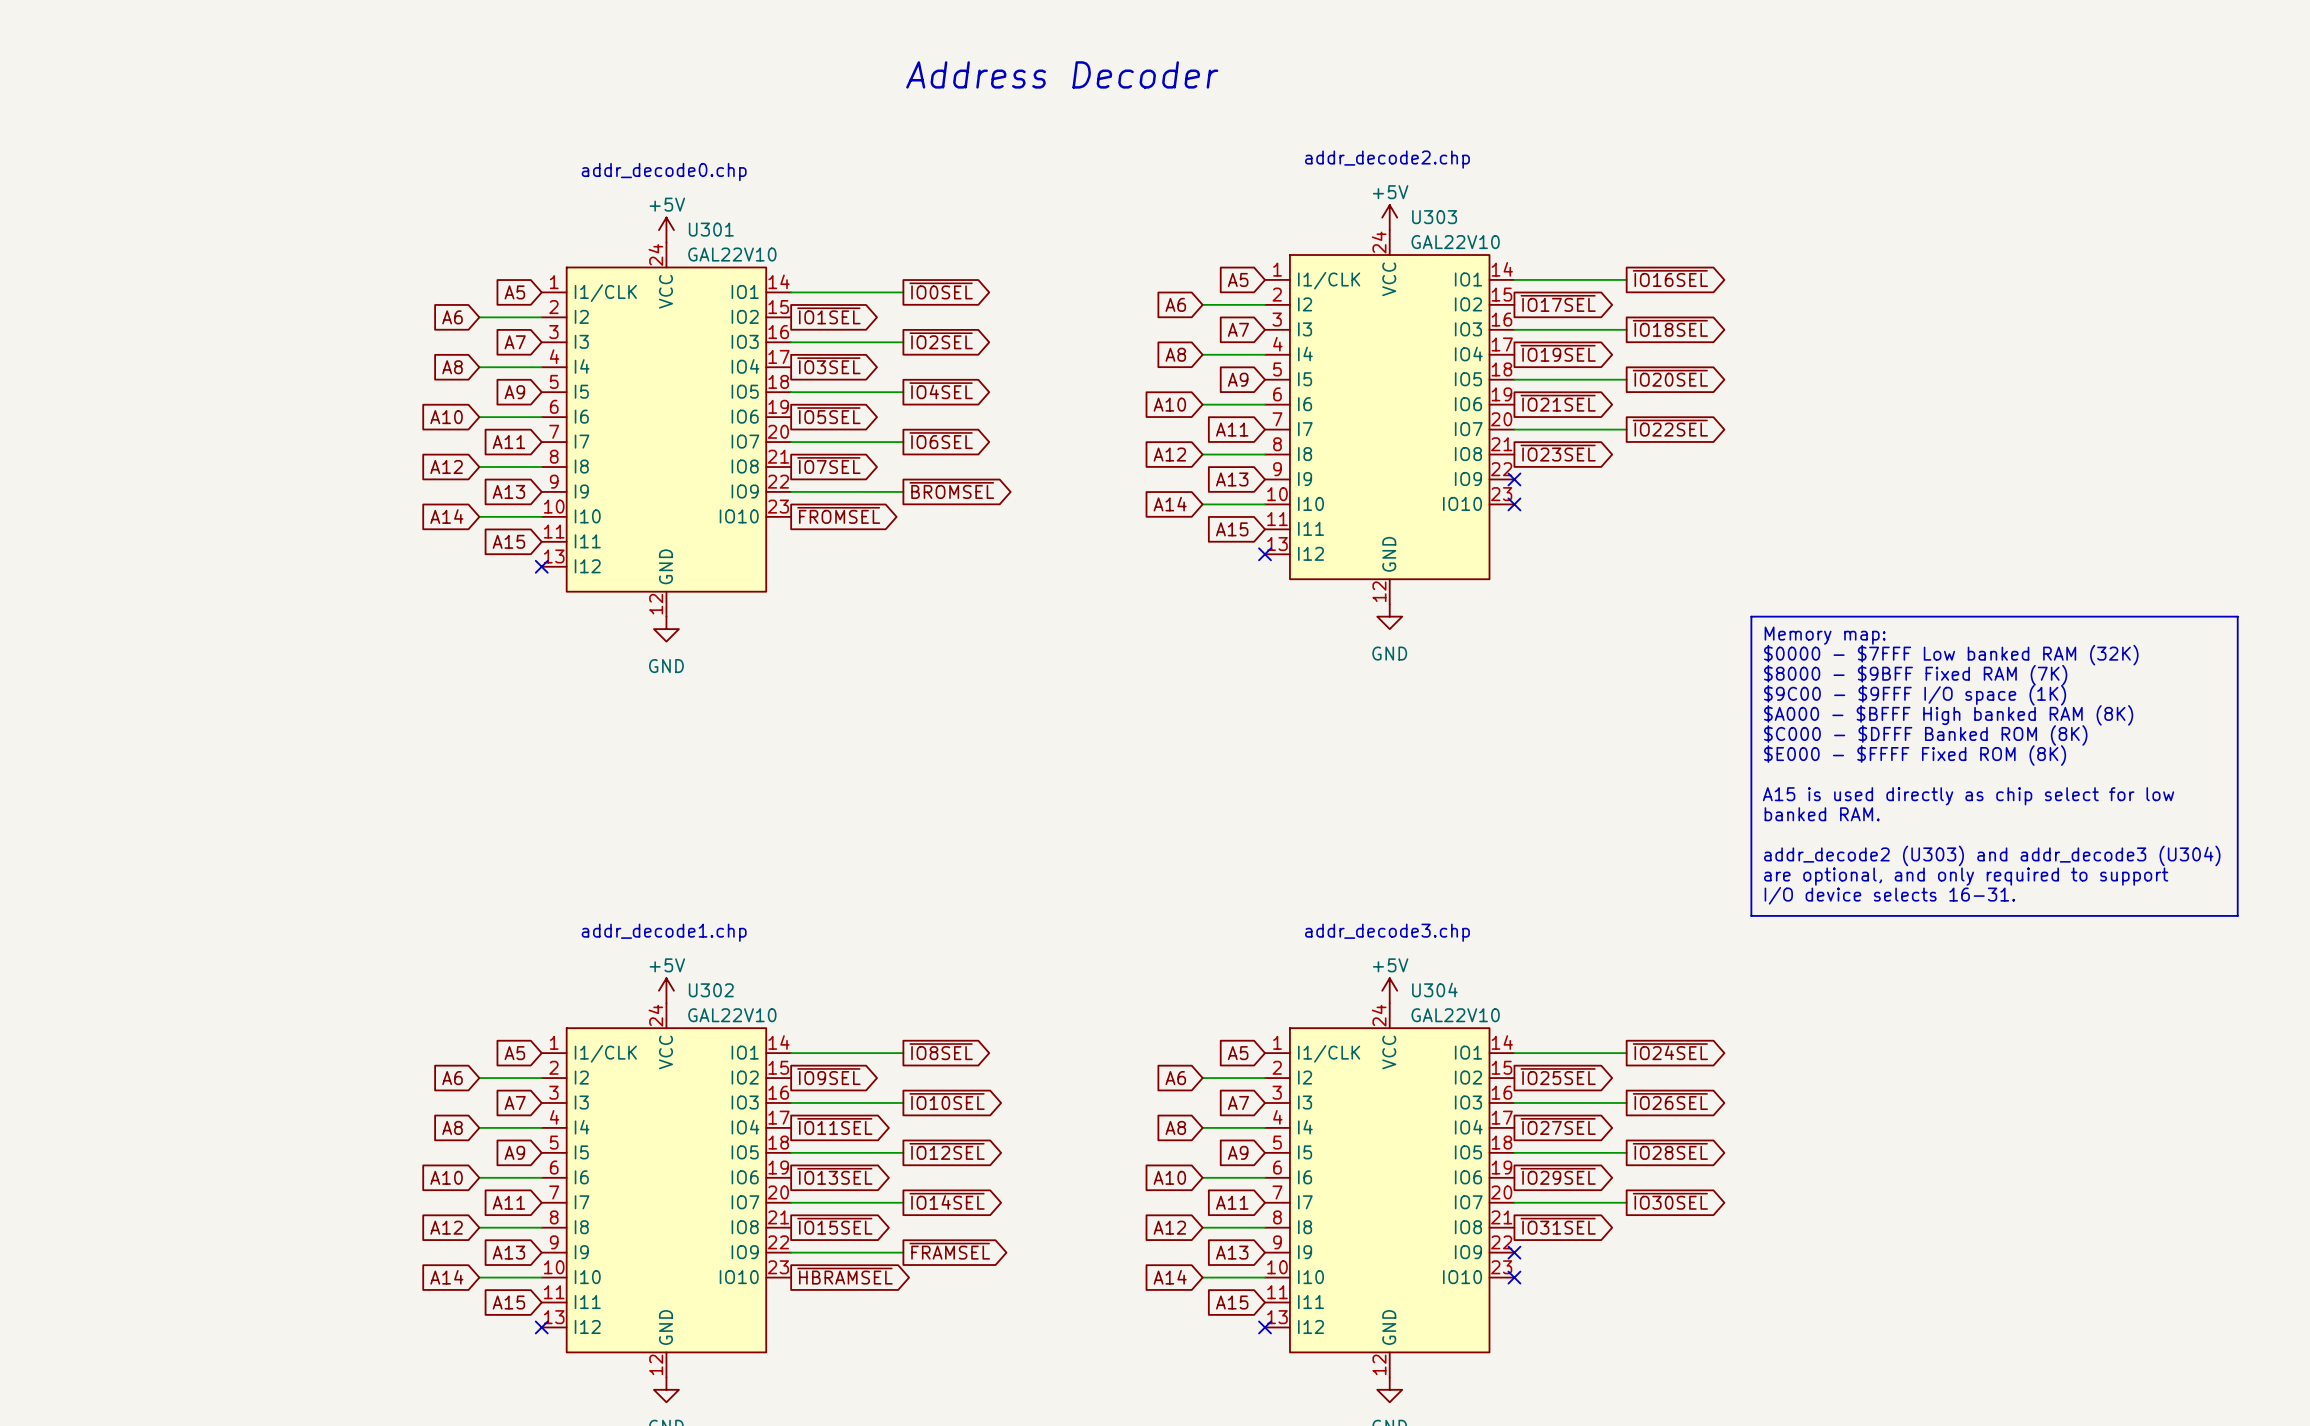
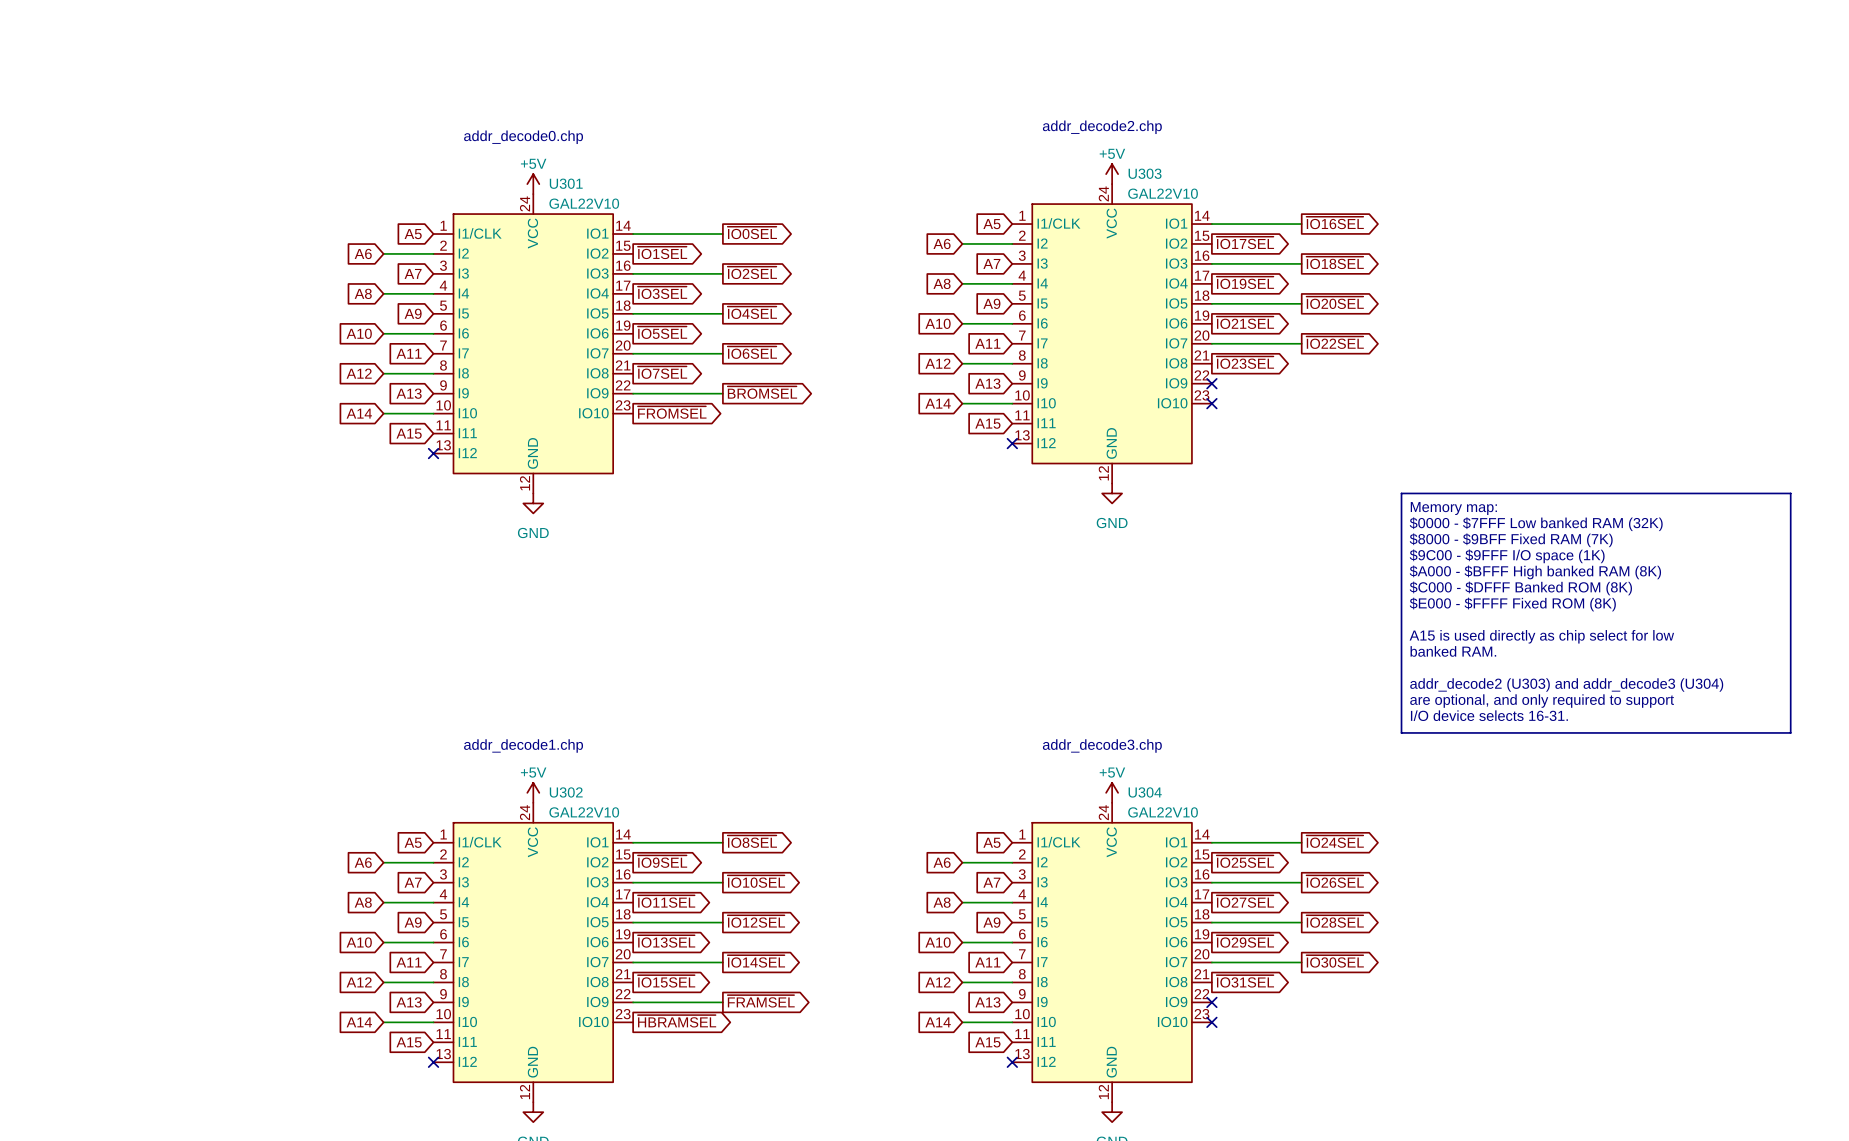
text: Address Decoder (1062, 74) -> none

